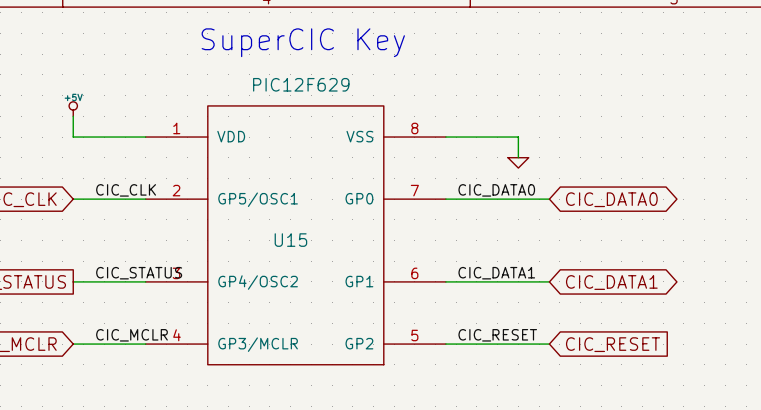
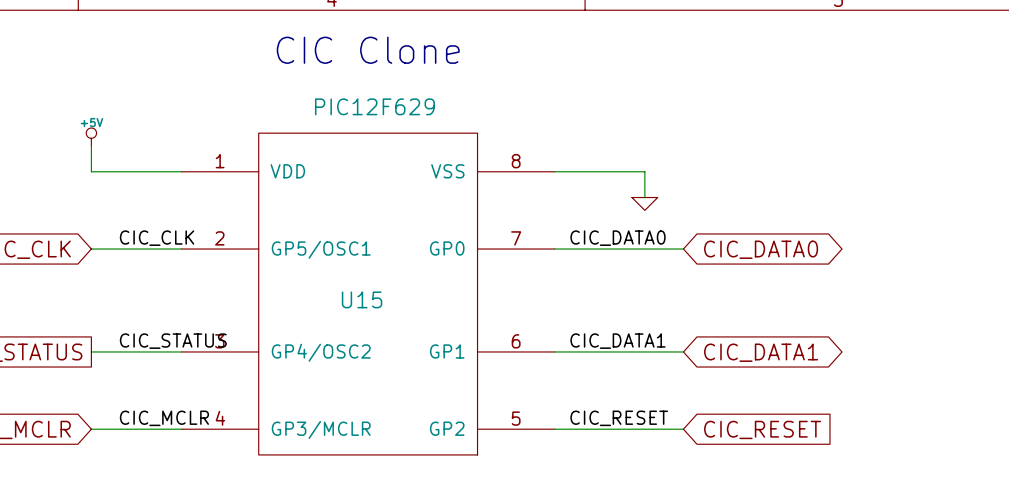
text: none -> CIC Clone (368, 50)
text: SuperCIC Key (303, 42) -> none

